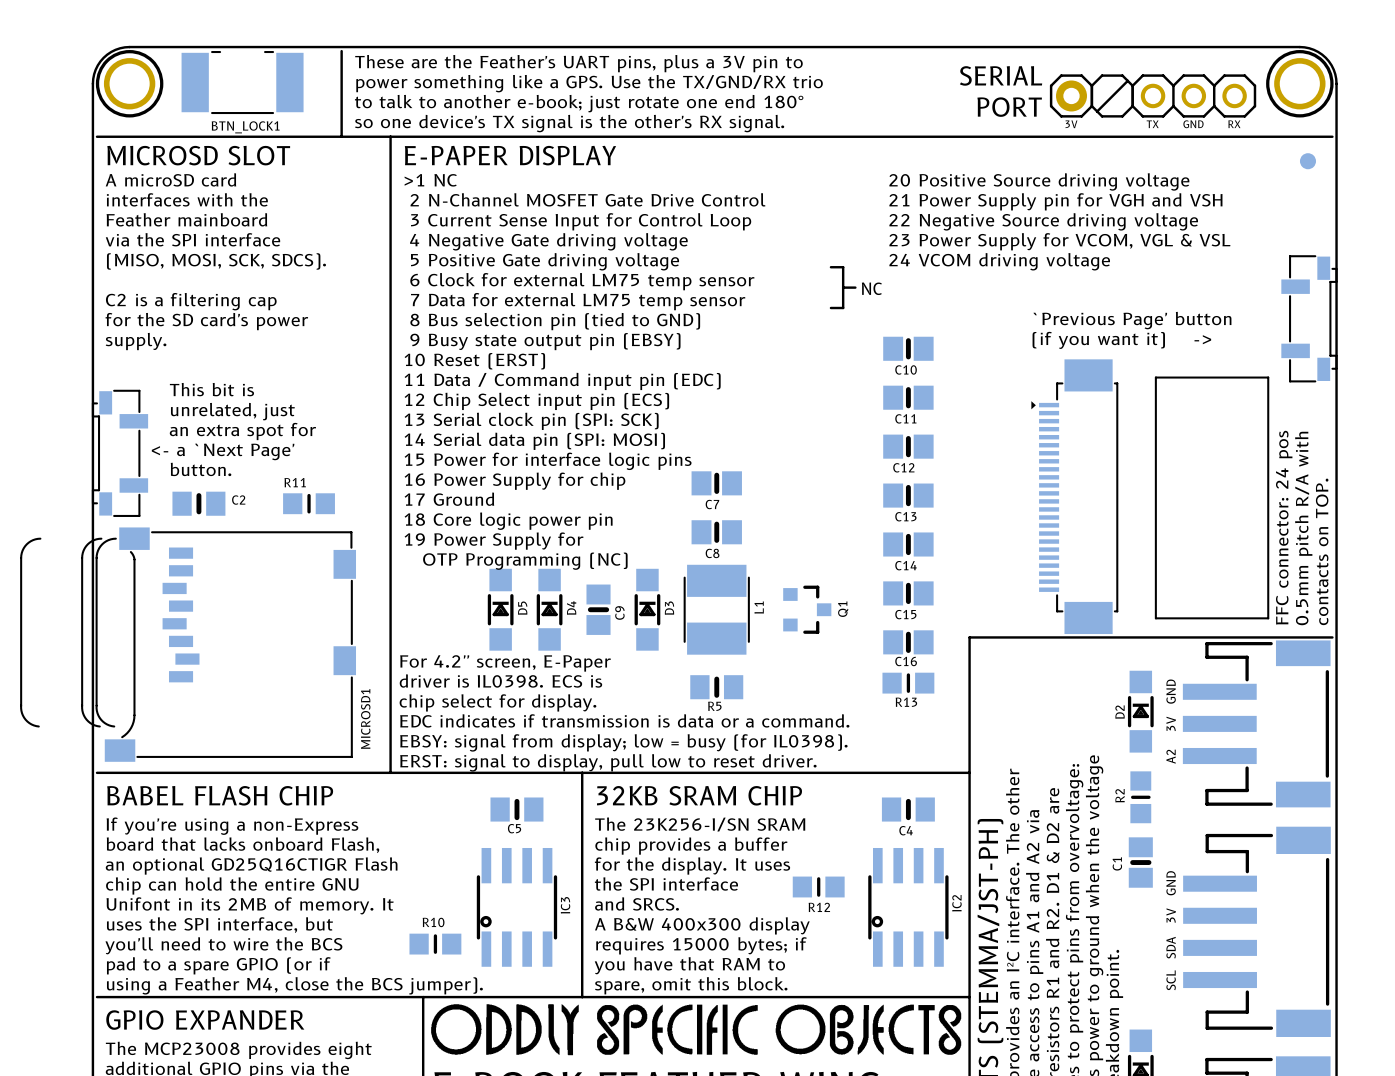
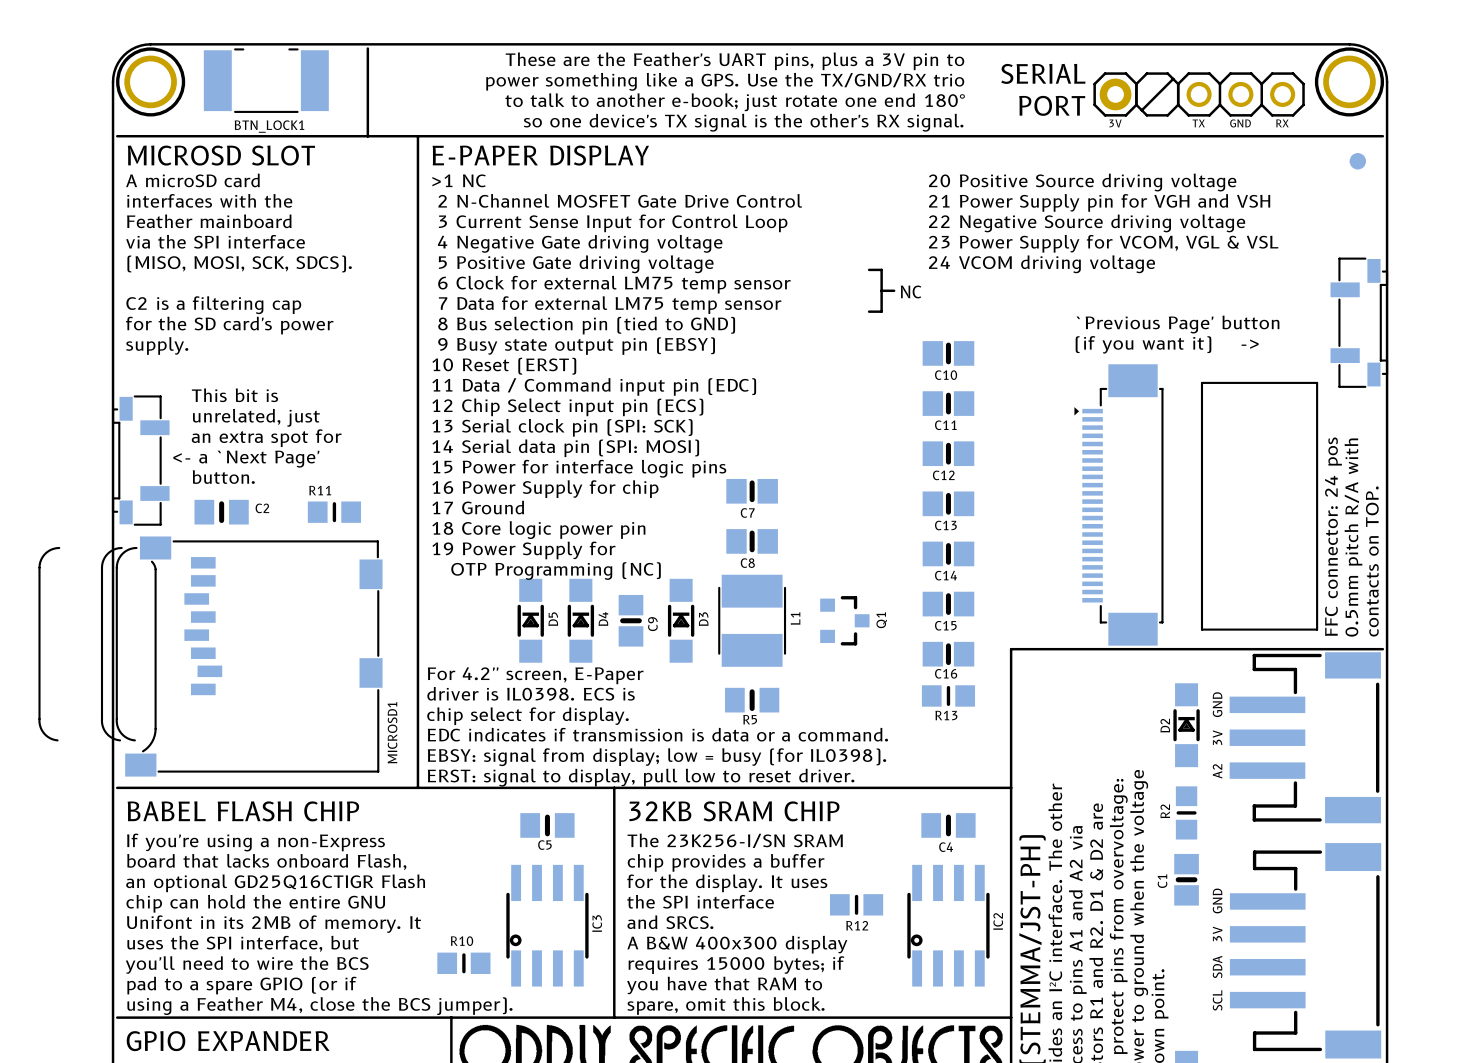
text: These are the Feather's UART pins, plus a 3V pin to (578, 63) -> none
text: none -> These are the Feather's UART pins, plus a 3V pin to (734, 61)
text: power something like a GPS. Use the TX/GND/RX trio (589, 83) -> none
text: none -> power something like a GPS. Use the TX/GND/RX trio (725, 81)
text: to talk to another e-book; just rotate one end 180° (579, 103) -> none
text: none -> to talk to another e-book; just rotate one end 180° (735, 102)
text: so one device's TX signal is the other's RX signal. (569, 123) -> none
text: none -> so one device's TX signal is the other's RX signal. (743, 122)

